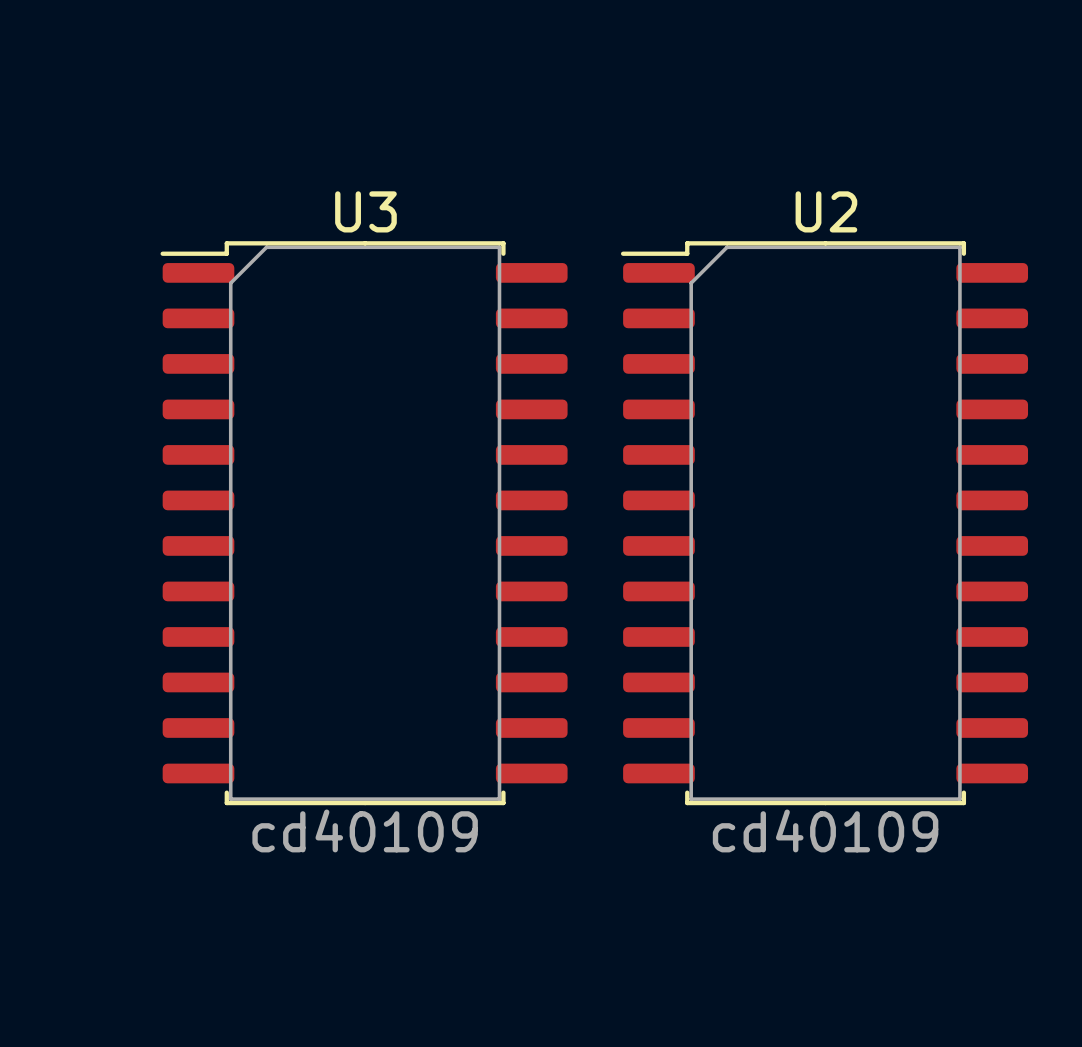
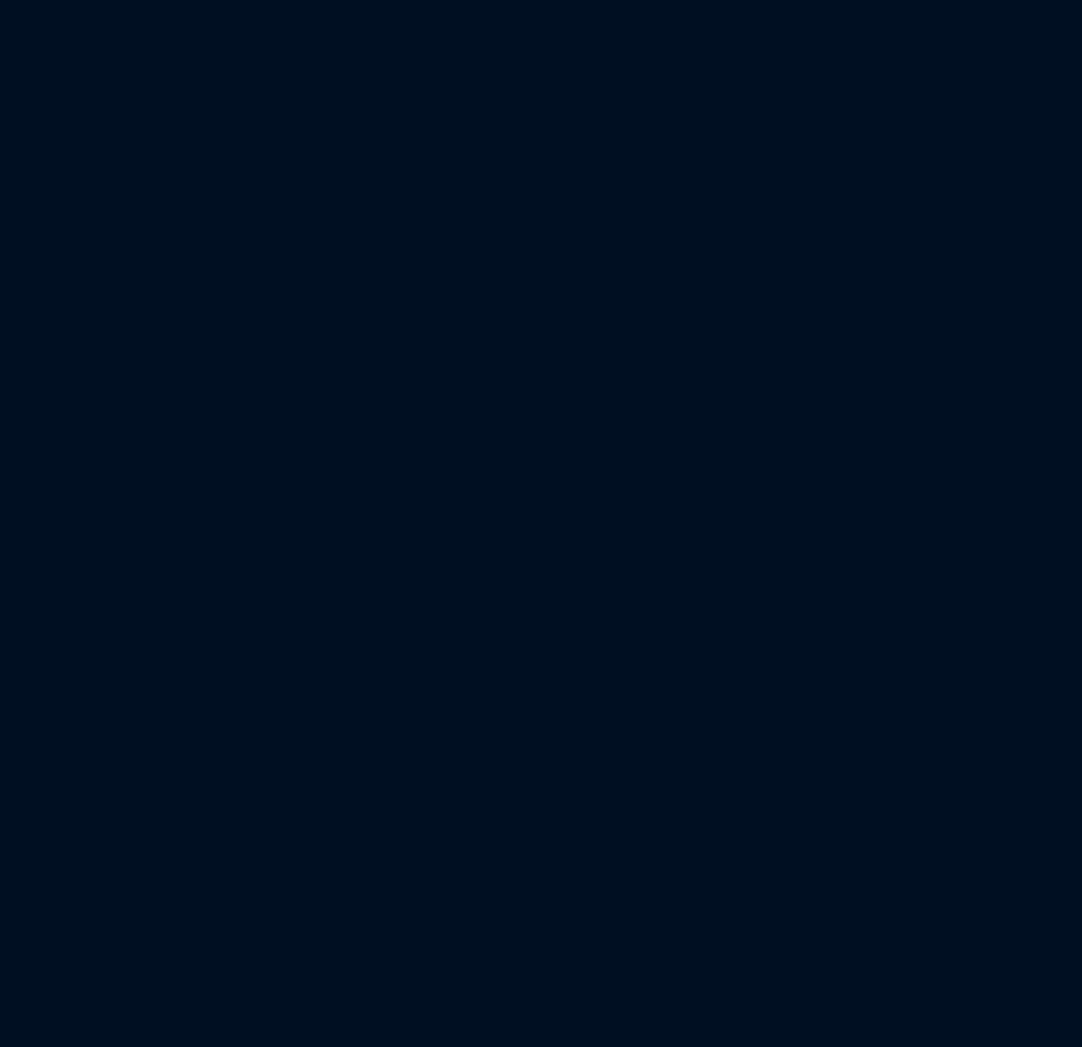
U3: cd40109 (364, 523) -> none
U2: cd40109 (824, 523) -> none

